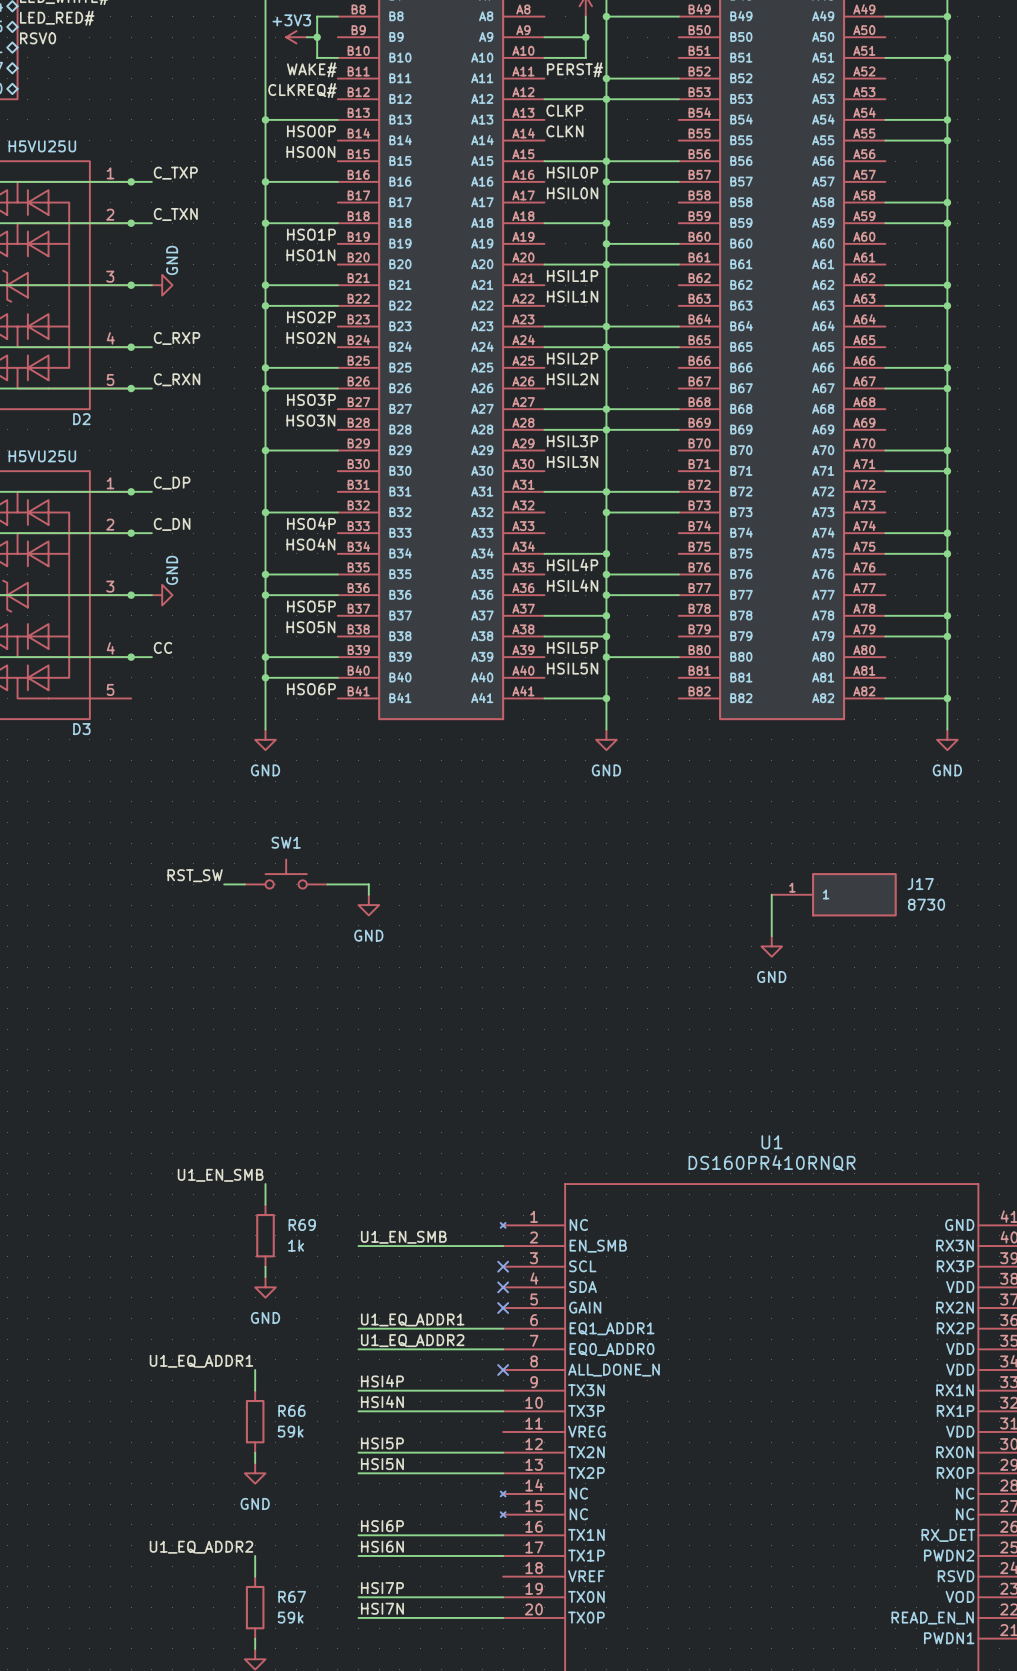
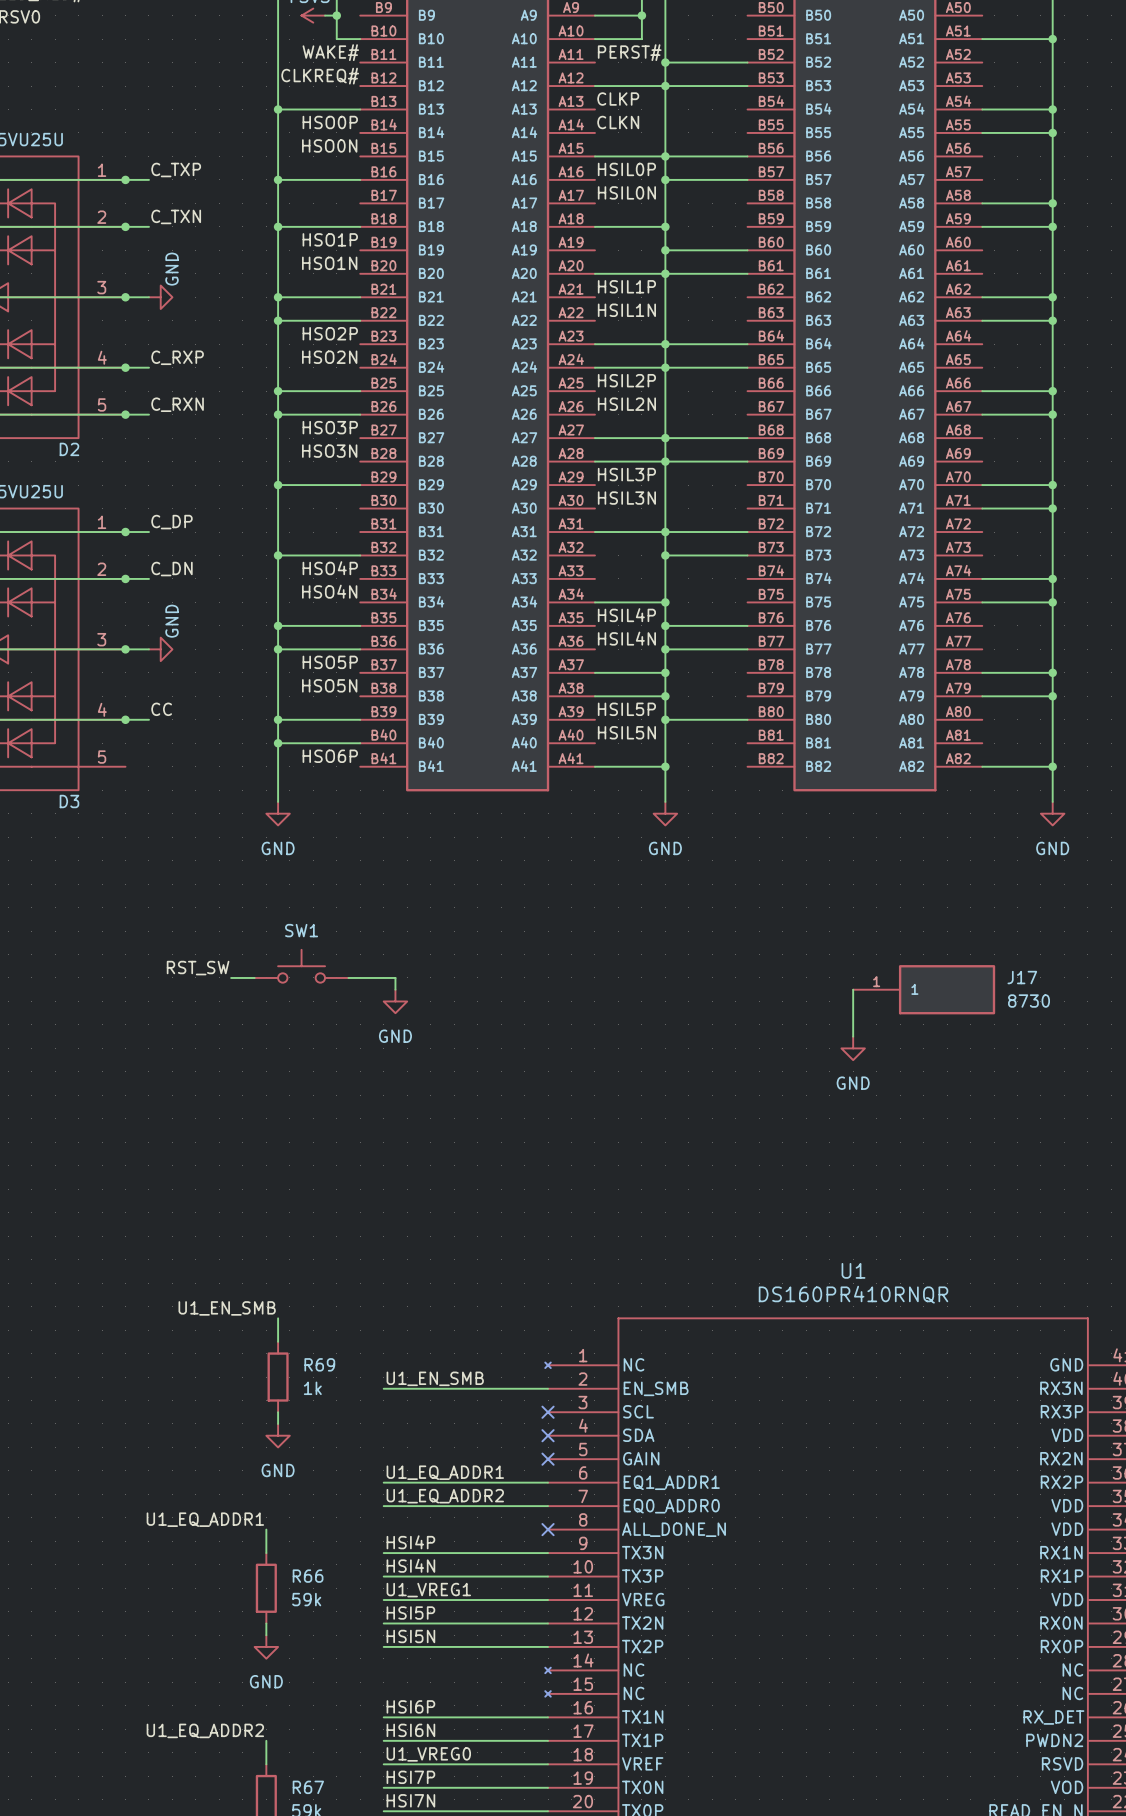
label: none -> U1_VREG1 (428, 1590)
wire: none -> (383, 1600) (548, 1600)
label: none -> U1_VREG0 (428, 1754)
wire: none -> (383, 1764) (548, 1764)

